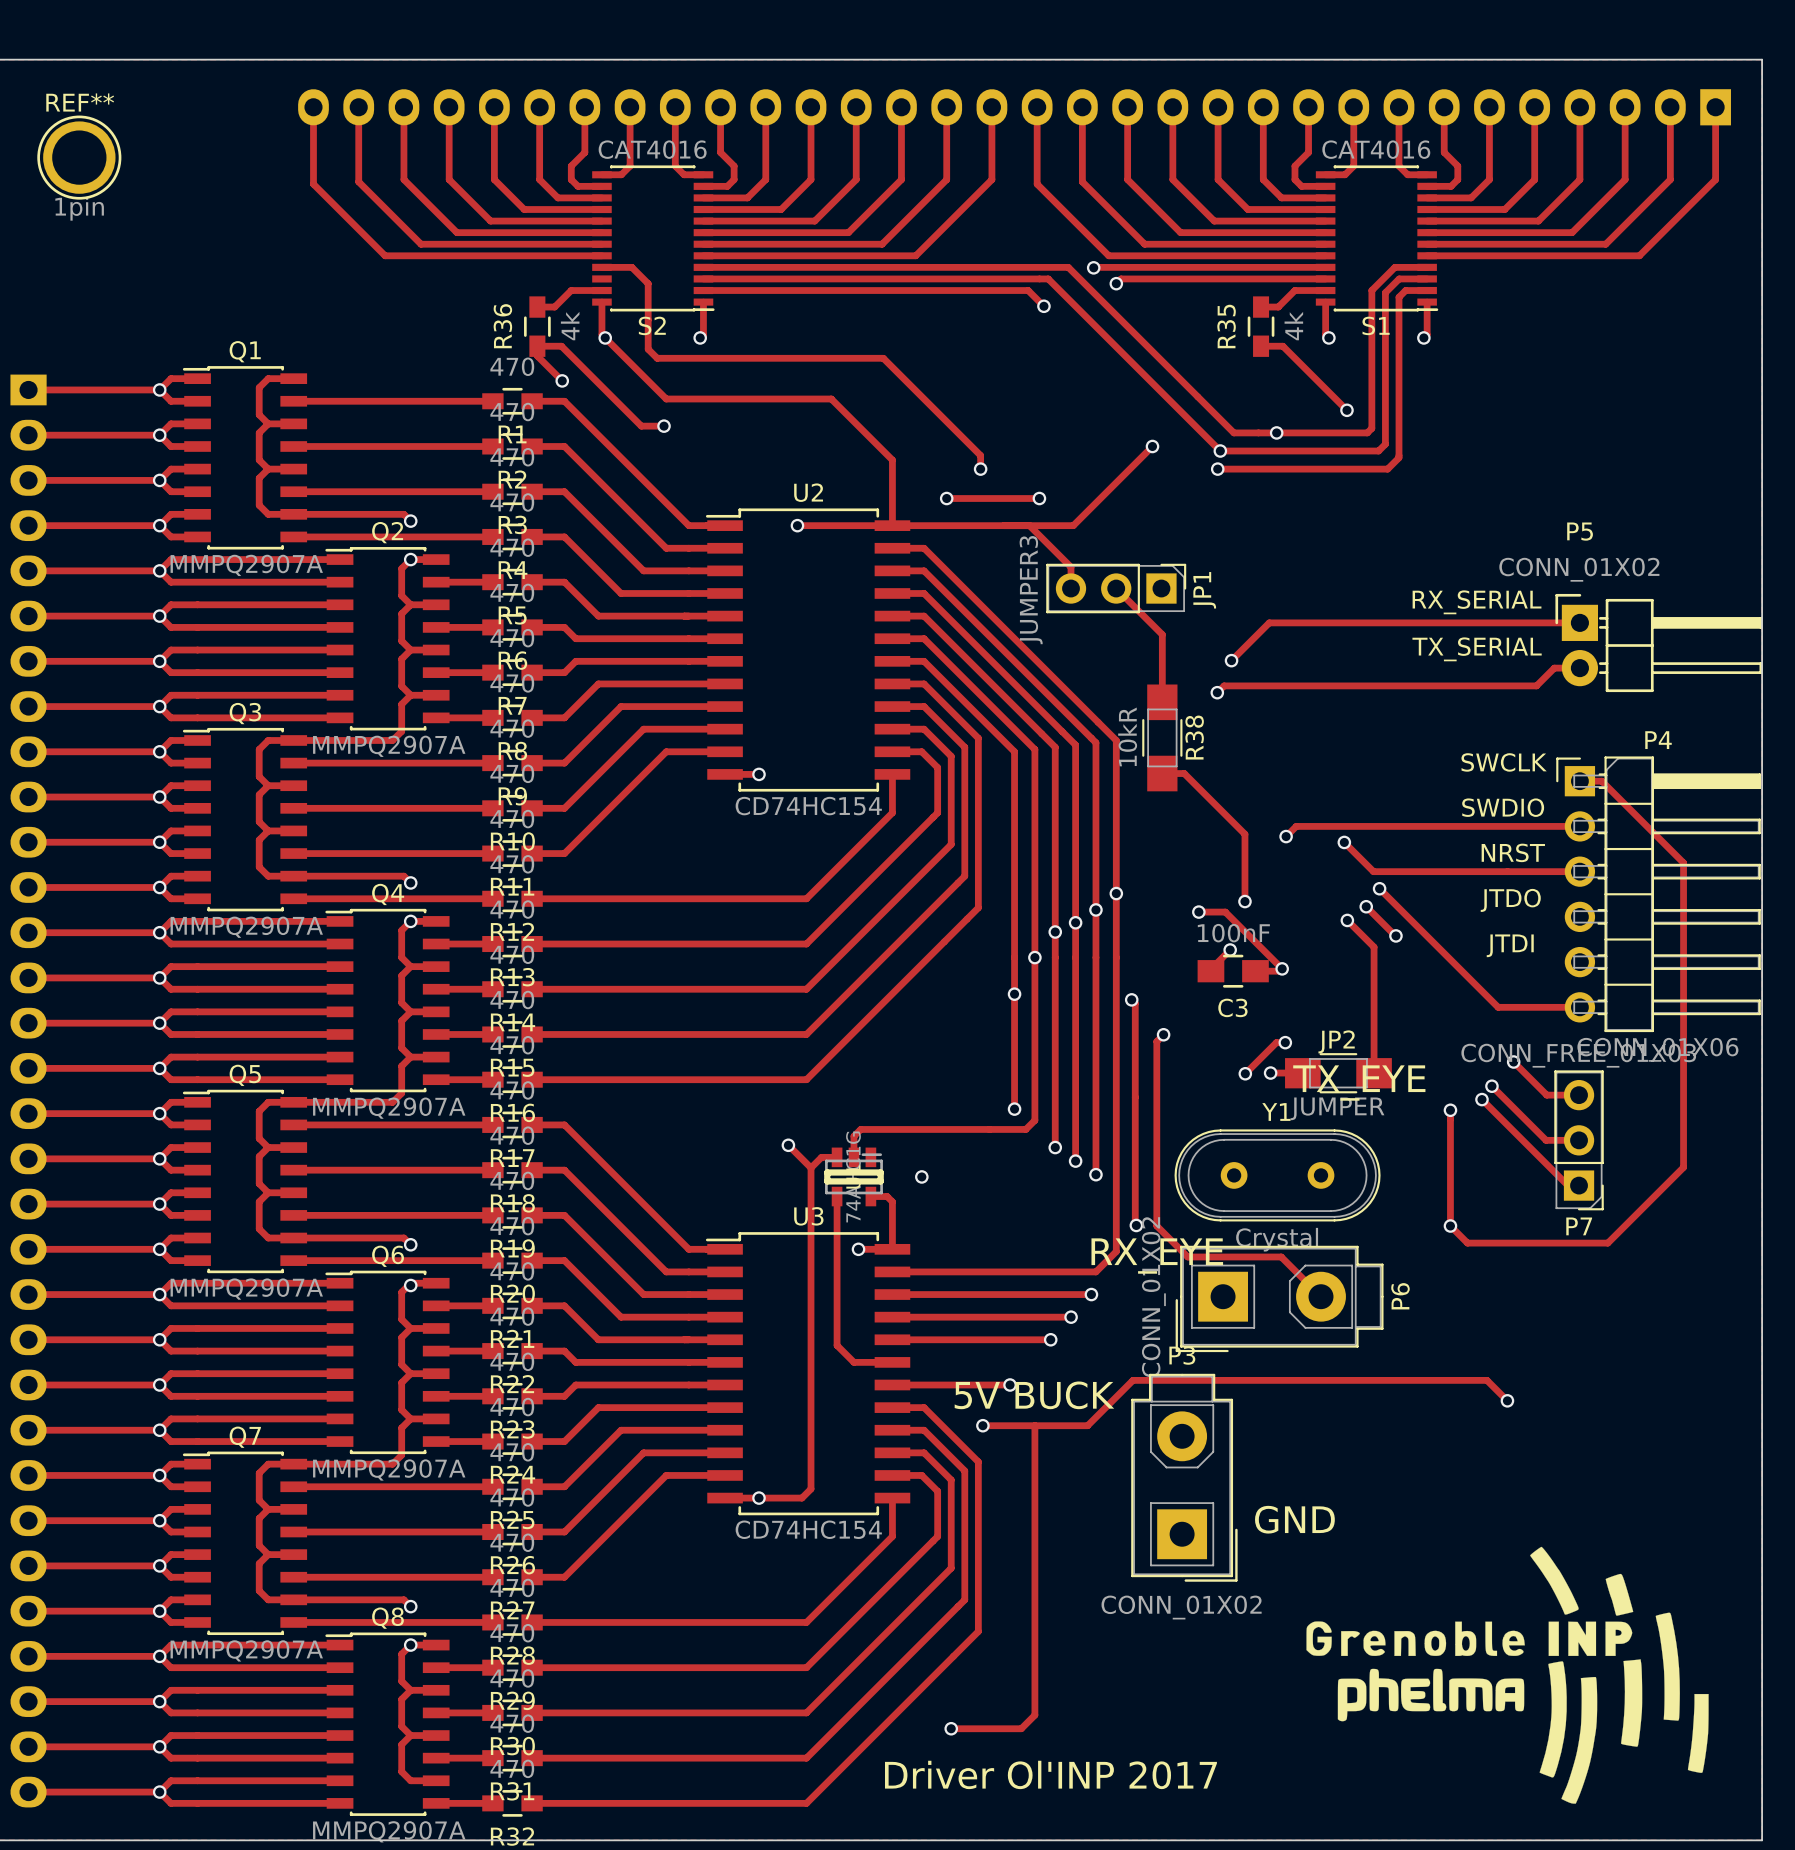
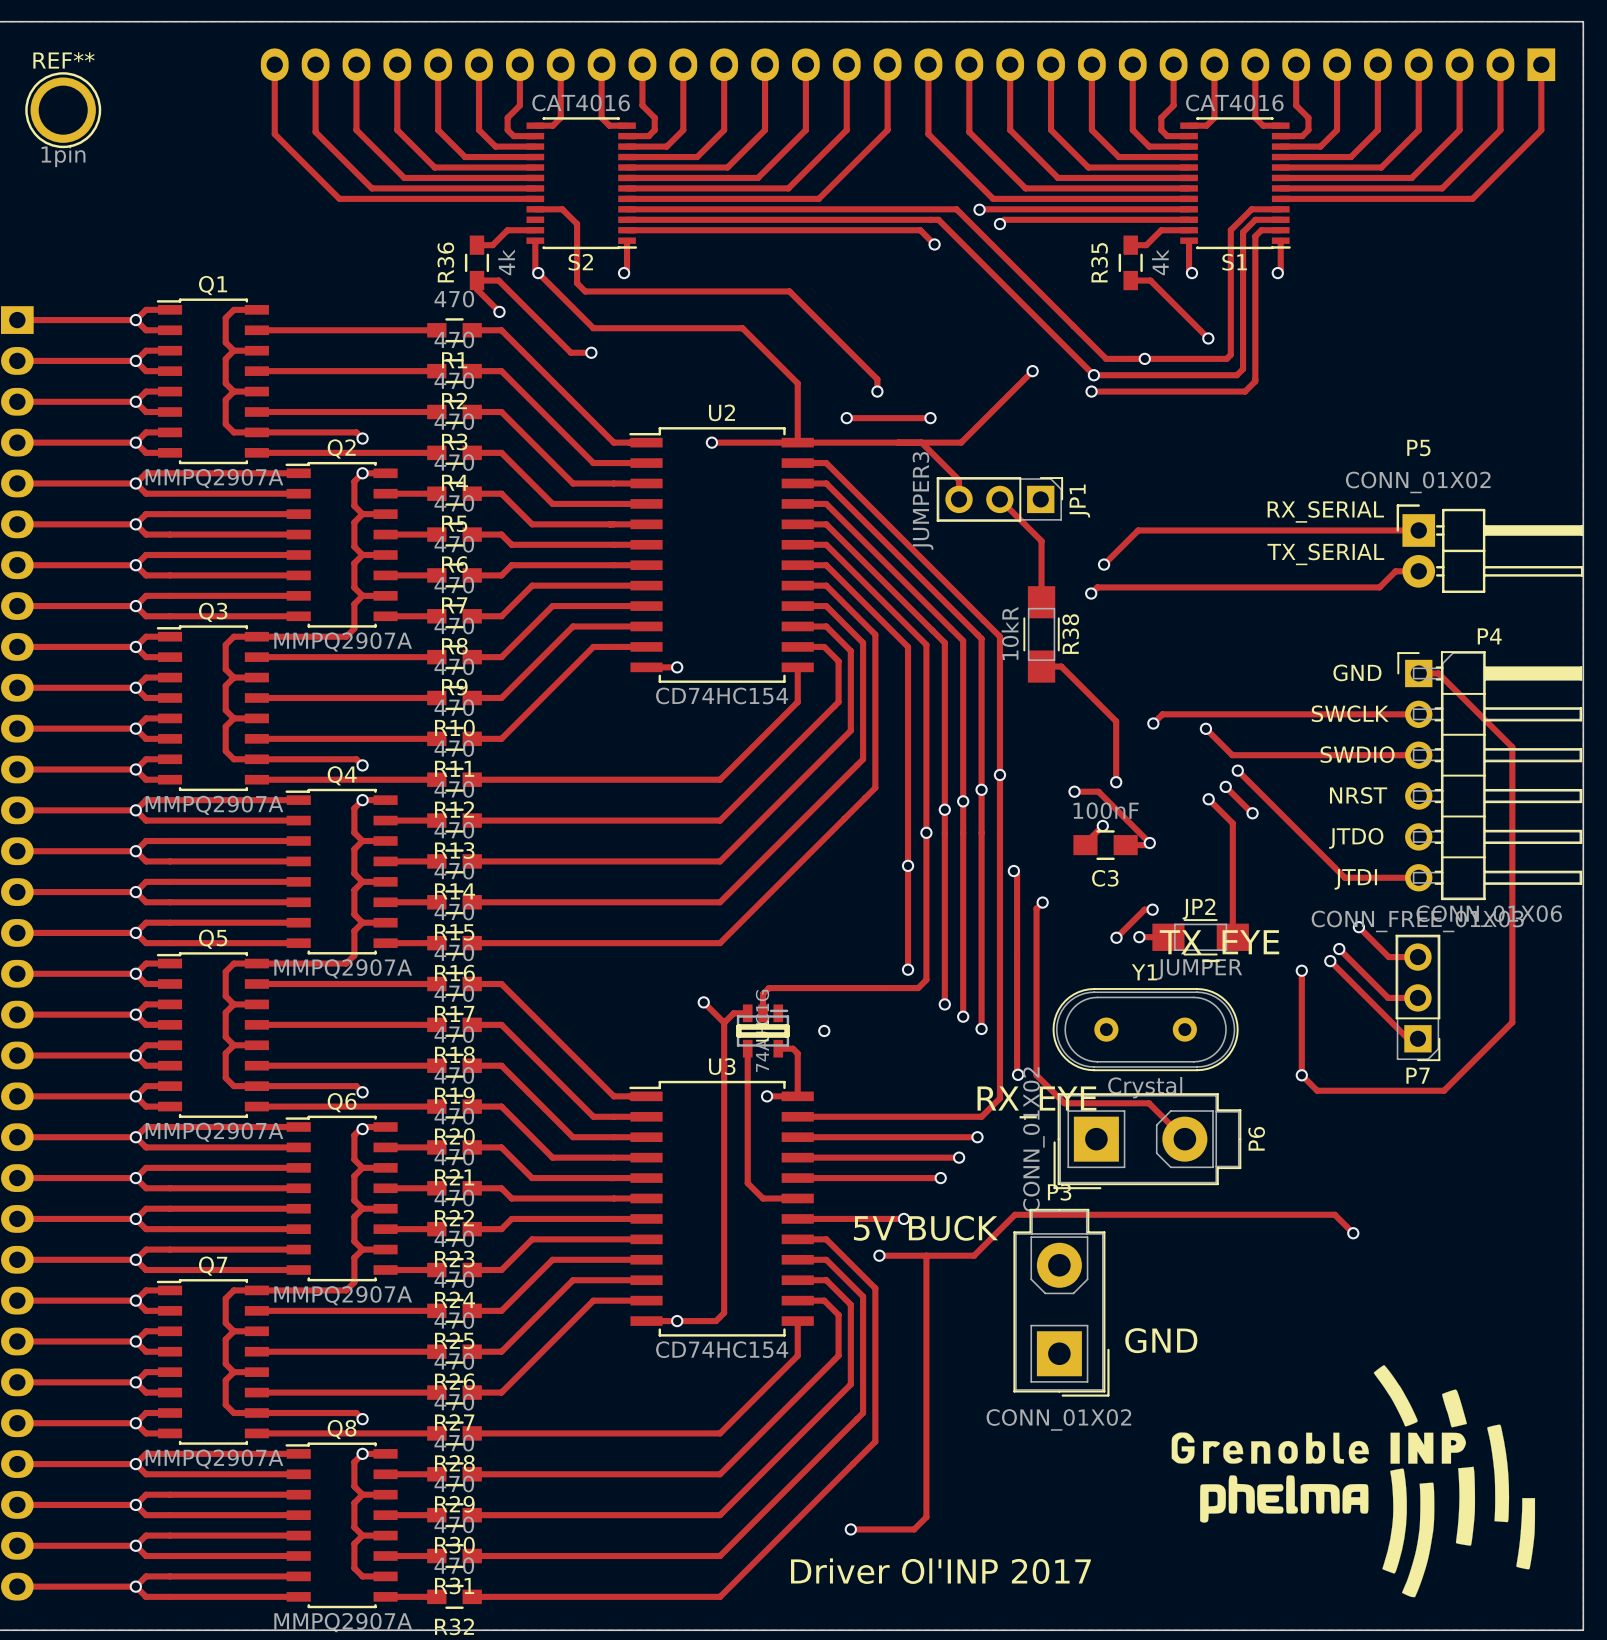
text position: SWCLK (1504, 762) -> SWCLK (1350, 713)
text: none -> GND (1357, 672)
text position: SWDIO (1503, 807) -> SWDIO (1357, 754)
text position: NRST (1513, 852) -> NRST (1358, 795)
text position: JTDO (1510, 900) -> JTDO (1356, 838)
text position: JTDI (1510, 945) -> JTDI (1355, 879)

